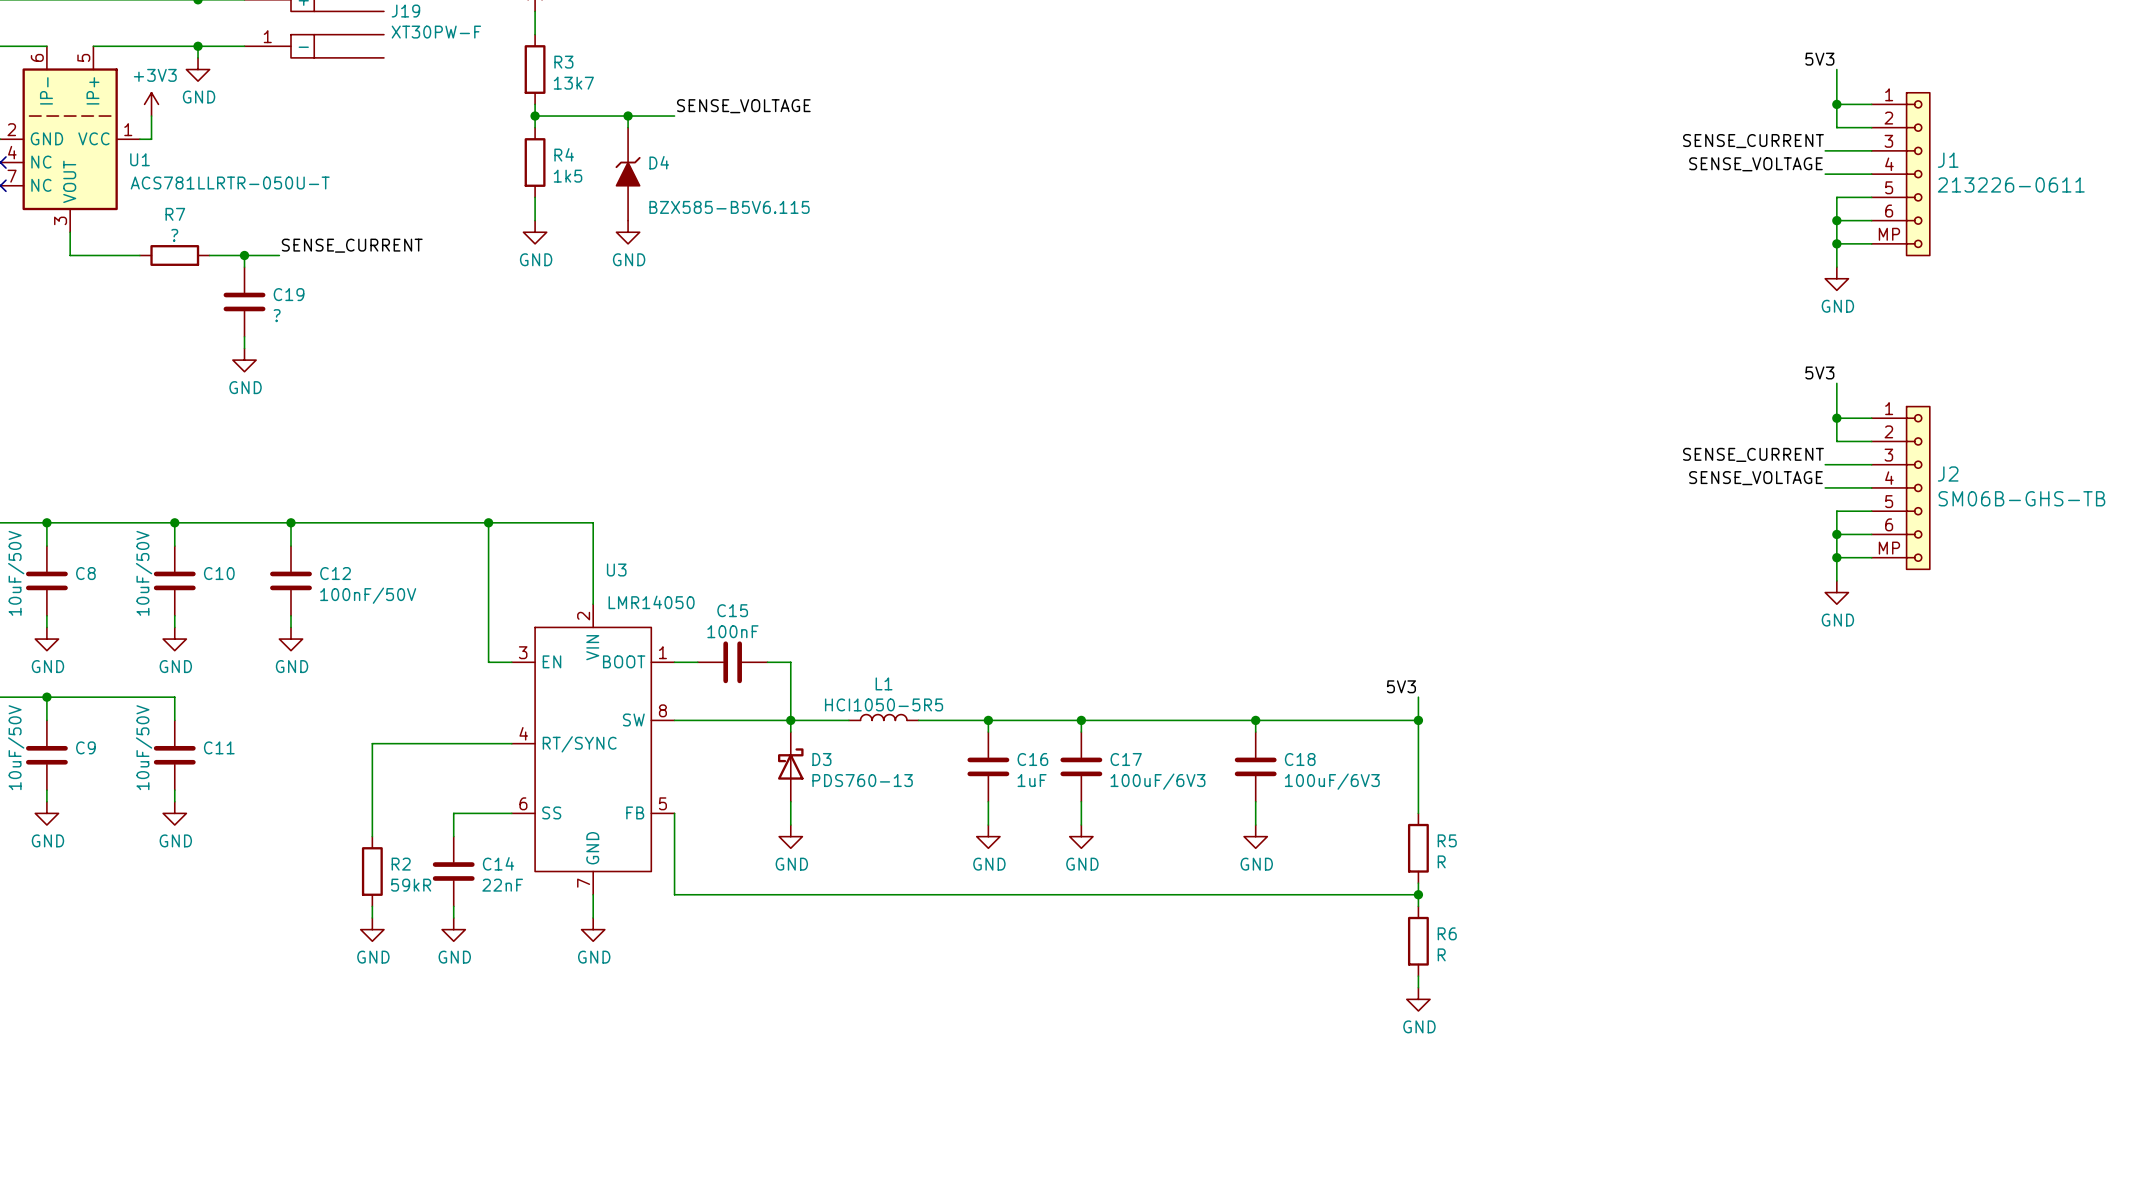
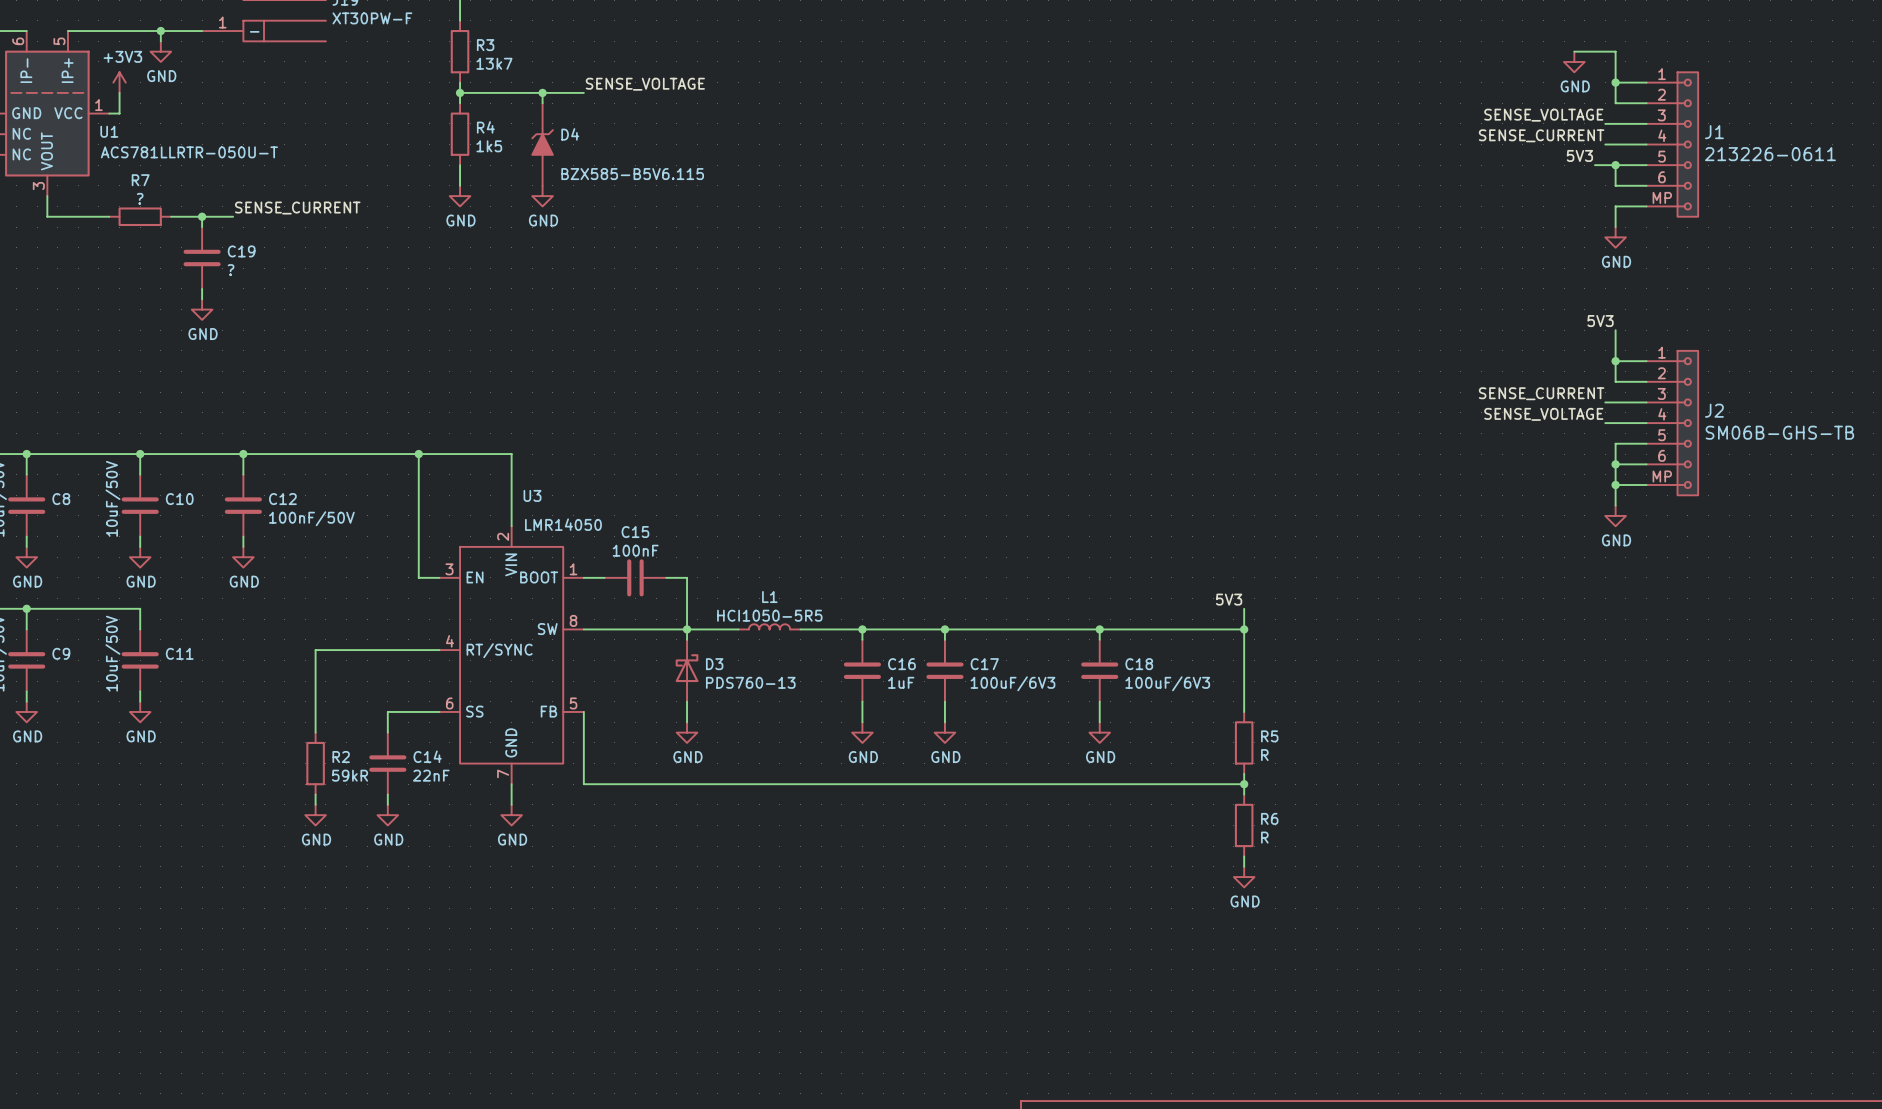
label position: 5V3 (1819, 59) -> 5V3 (1579, 155)
wire: none -> (1574, 51) (1615, 51)
power symbol: none -> GND (1574, 61)
label: SENSE_CURRENT (1753, 141) -> SENSE_VOLTAGE (1543, 115)
label: SENSE_VOLTAGE (1755, 164) -> SENSE_CURRENT (1541, 135)
wire: none -> (1594, 165) (1615, 165)
junction: none -> (1615, 165)
wire: (1836, 220) (1836, 243) -> none
junction: (1836, 220) -> none
junction: (1836, 243) -> none

